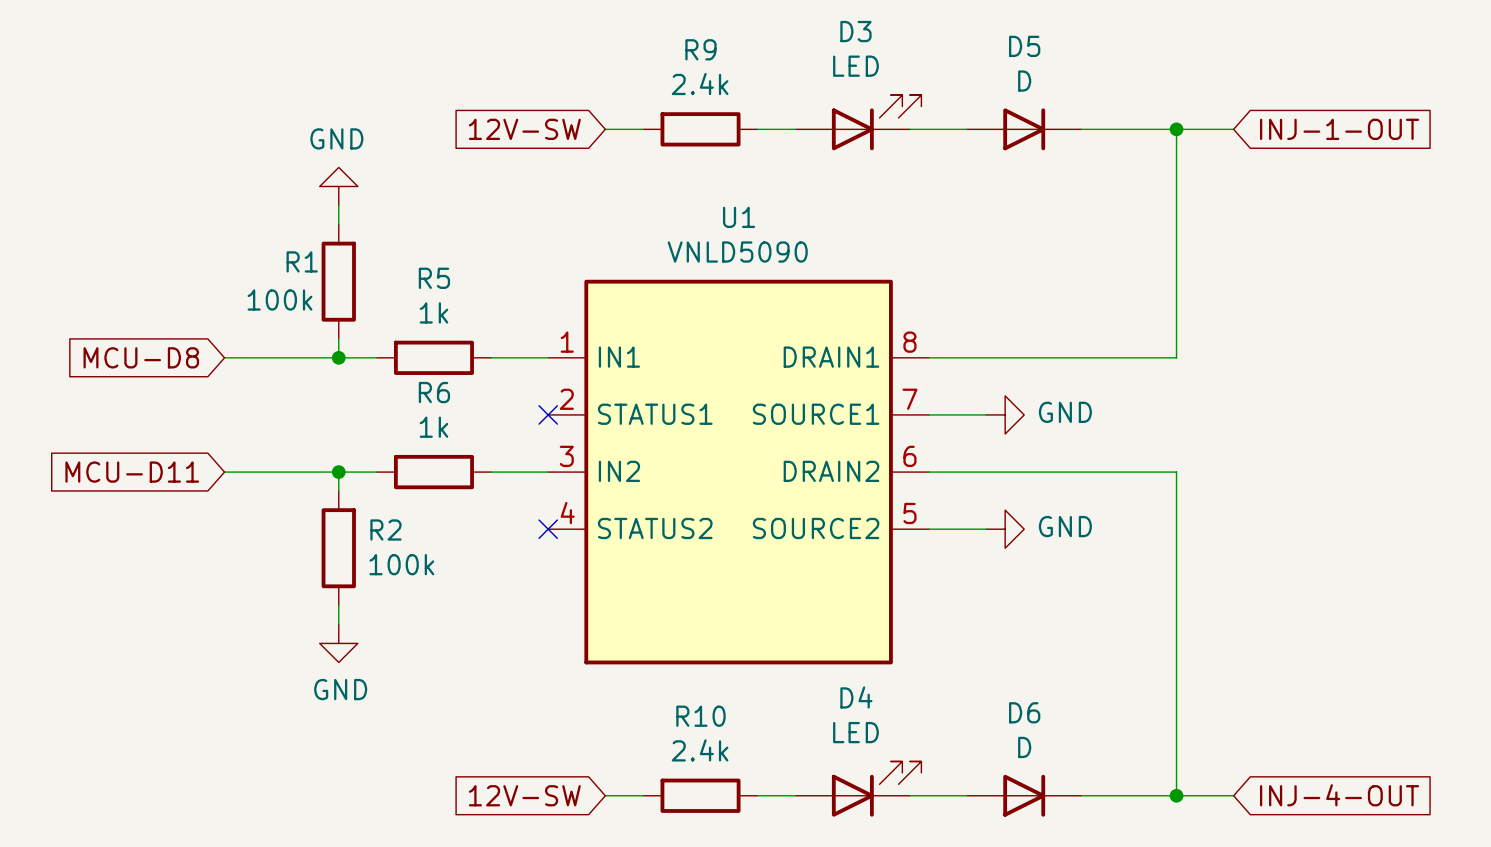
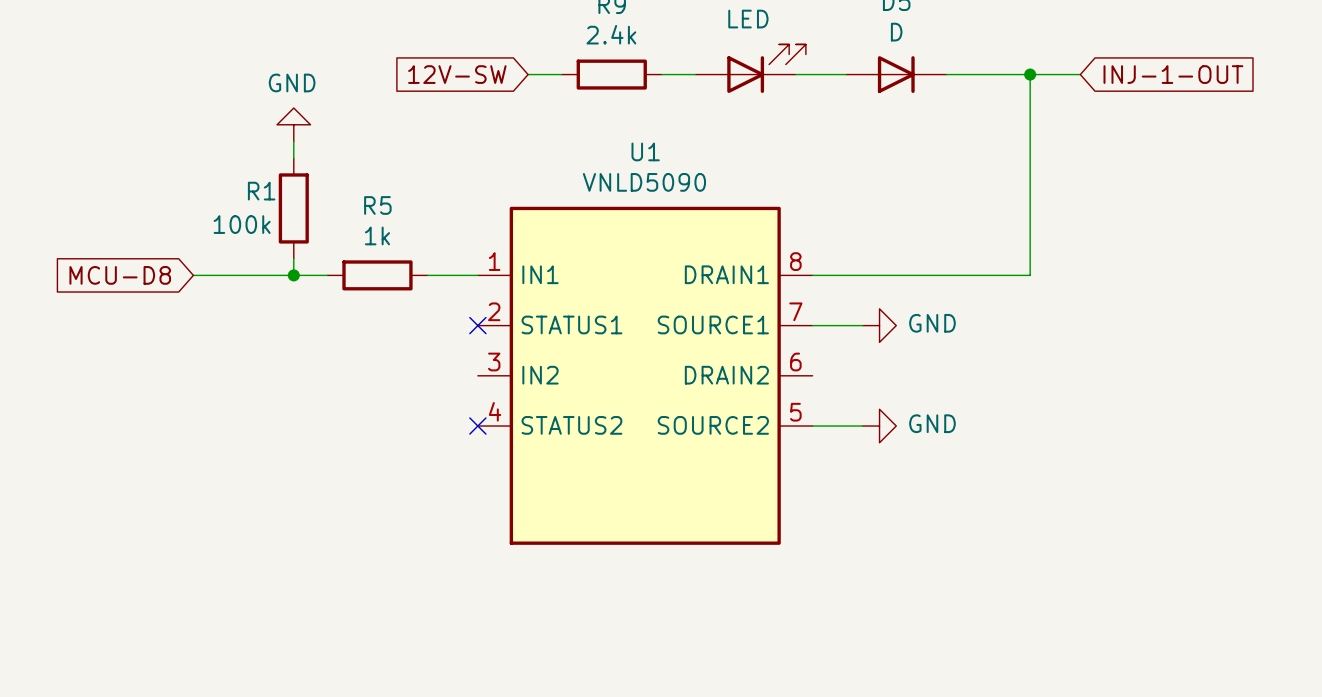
global label: MCU-D11 (132, 472) -> none
wire: (224, 472) (376, 472) -> none
wire: (338, 472) (338, 491) -> none
junction: (338, 472) -> none
R6: 1k (433, 472) -> none
wire: (491, 472) (548, 472) -> none
wire: (929, 472) (1176, 472) (1176, 795) -> none
R2: 100k (338, 548) -> none
wire: (338, 605) (338, 624) -> none
power symbol: GND (338, 643) -> none
D4: LED (858, 789) -> none
global label: 12V-SW (524, 795) -> none
wire: (605, 795) (643, 795) -> none
R10: 2.4k (700, 795) -> none
wire: (757, 795) (795, 795) -> none
wire: (909, 795) (967, 795) -> none
D6: D (1024, 795) -> none
wire: (1081, 795) (1233, 795) -> none
junction: (1176, 795) -> none
global label: INJ-4-OUT (1339, 795) -> none

